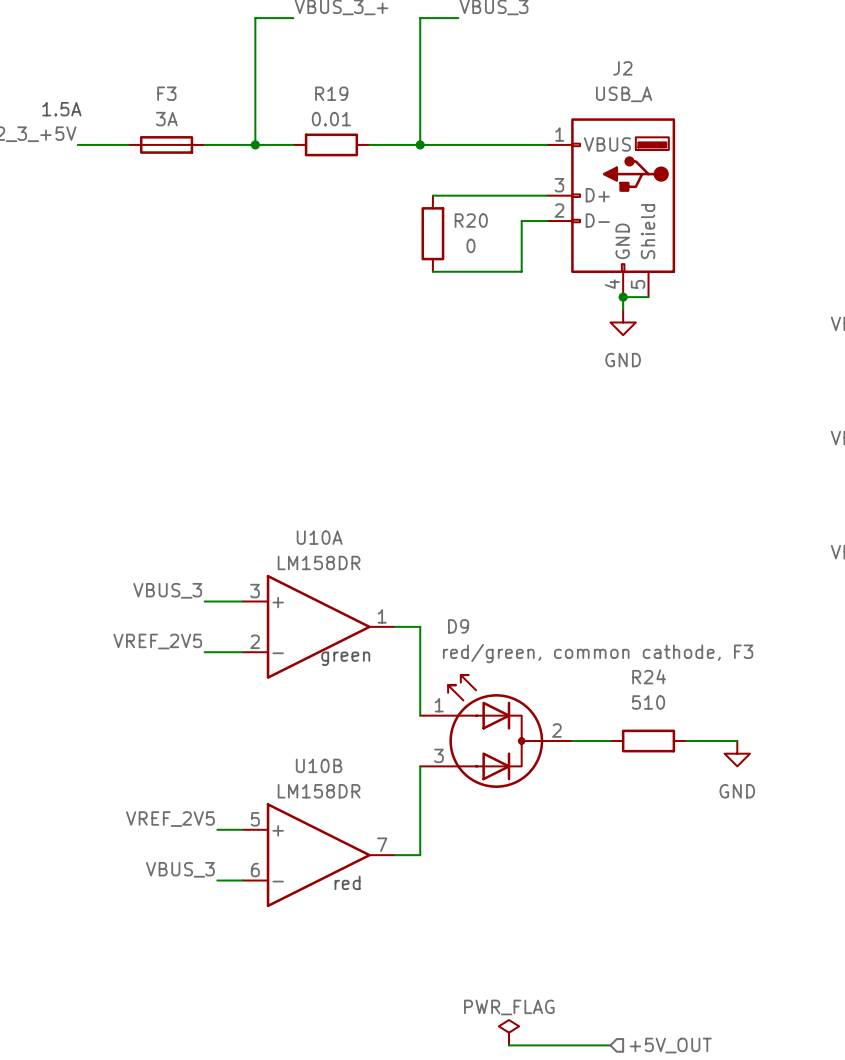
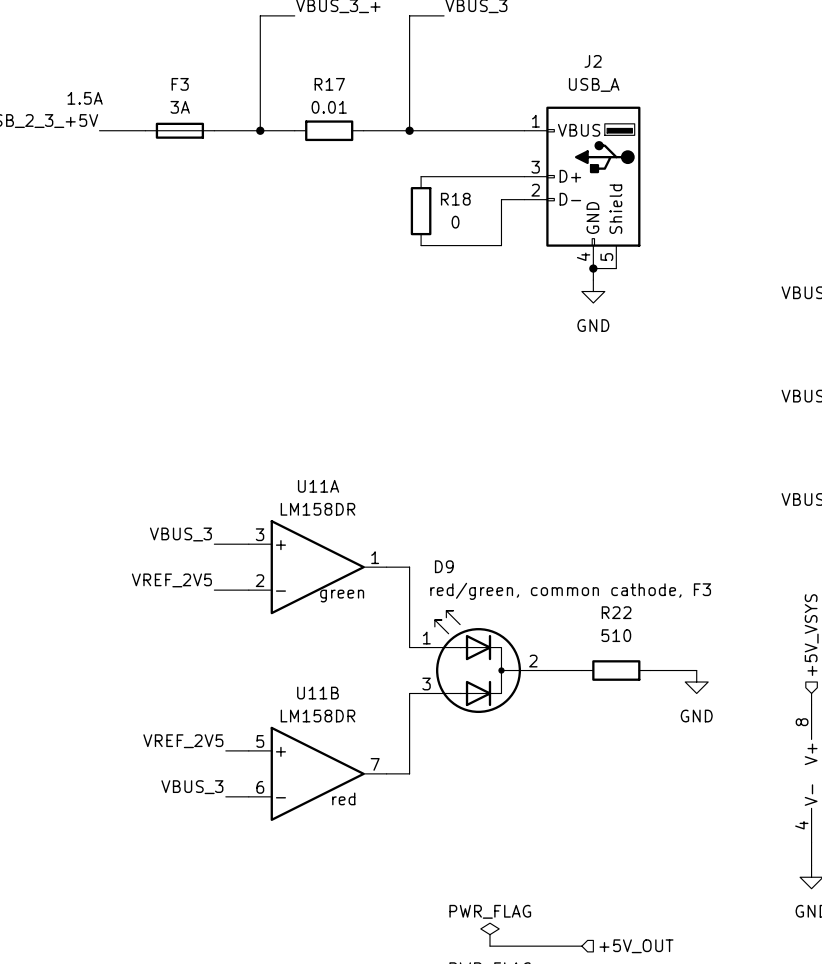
R19 name: R19 (331, 93) -> R17 (329, 84)
R20 name: R20 (471, 220) -> R18 (455, 199)
U10A name: U10A (319, 537) -> U11A (318, 486)
R24 name: R24 (649, 676) -> R22 (616, 612)
U10B name: U10B (319, 765) -> U11B (317, 693)

